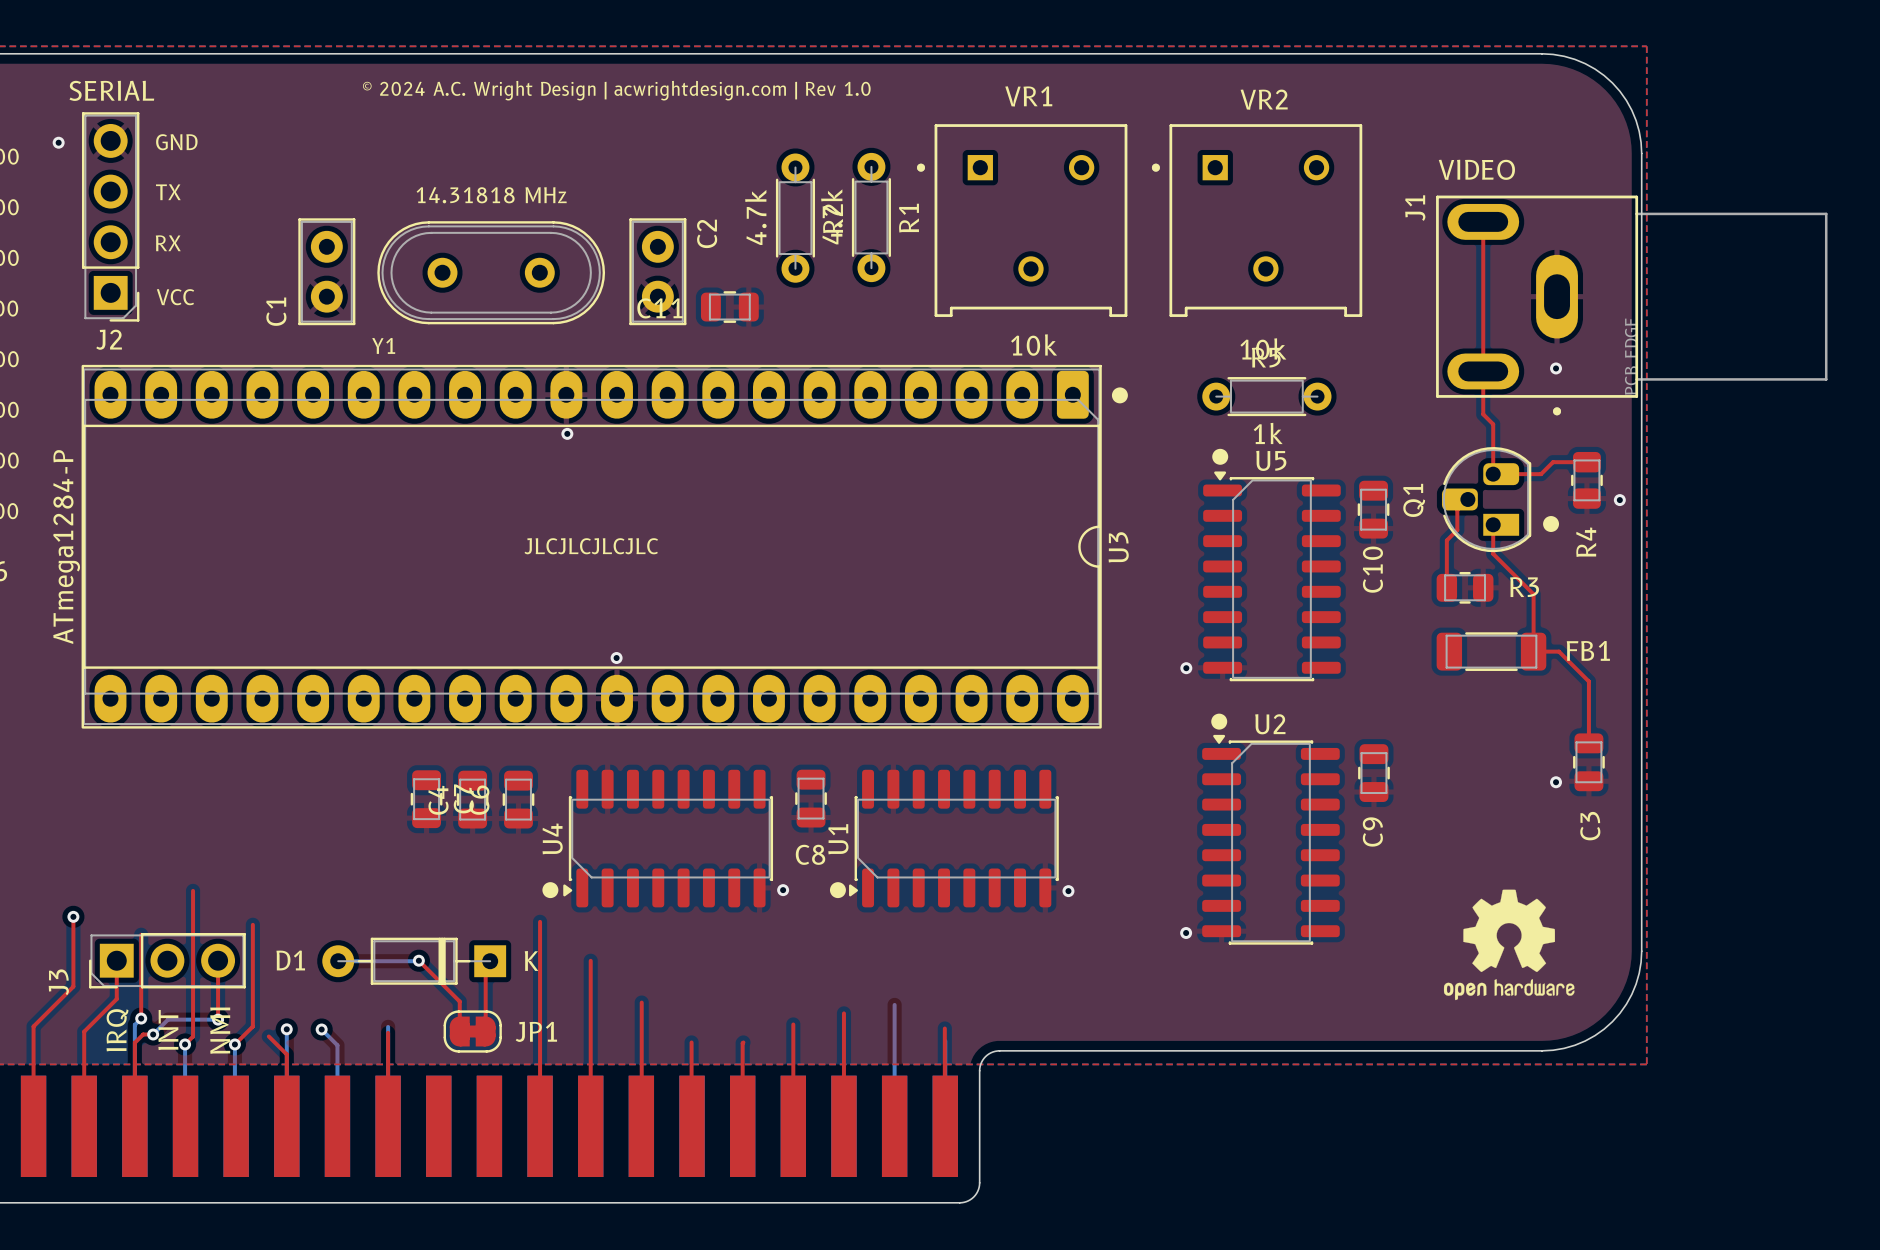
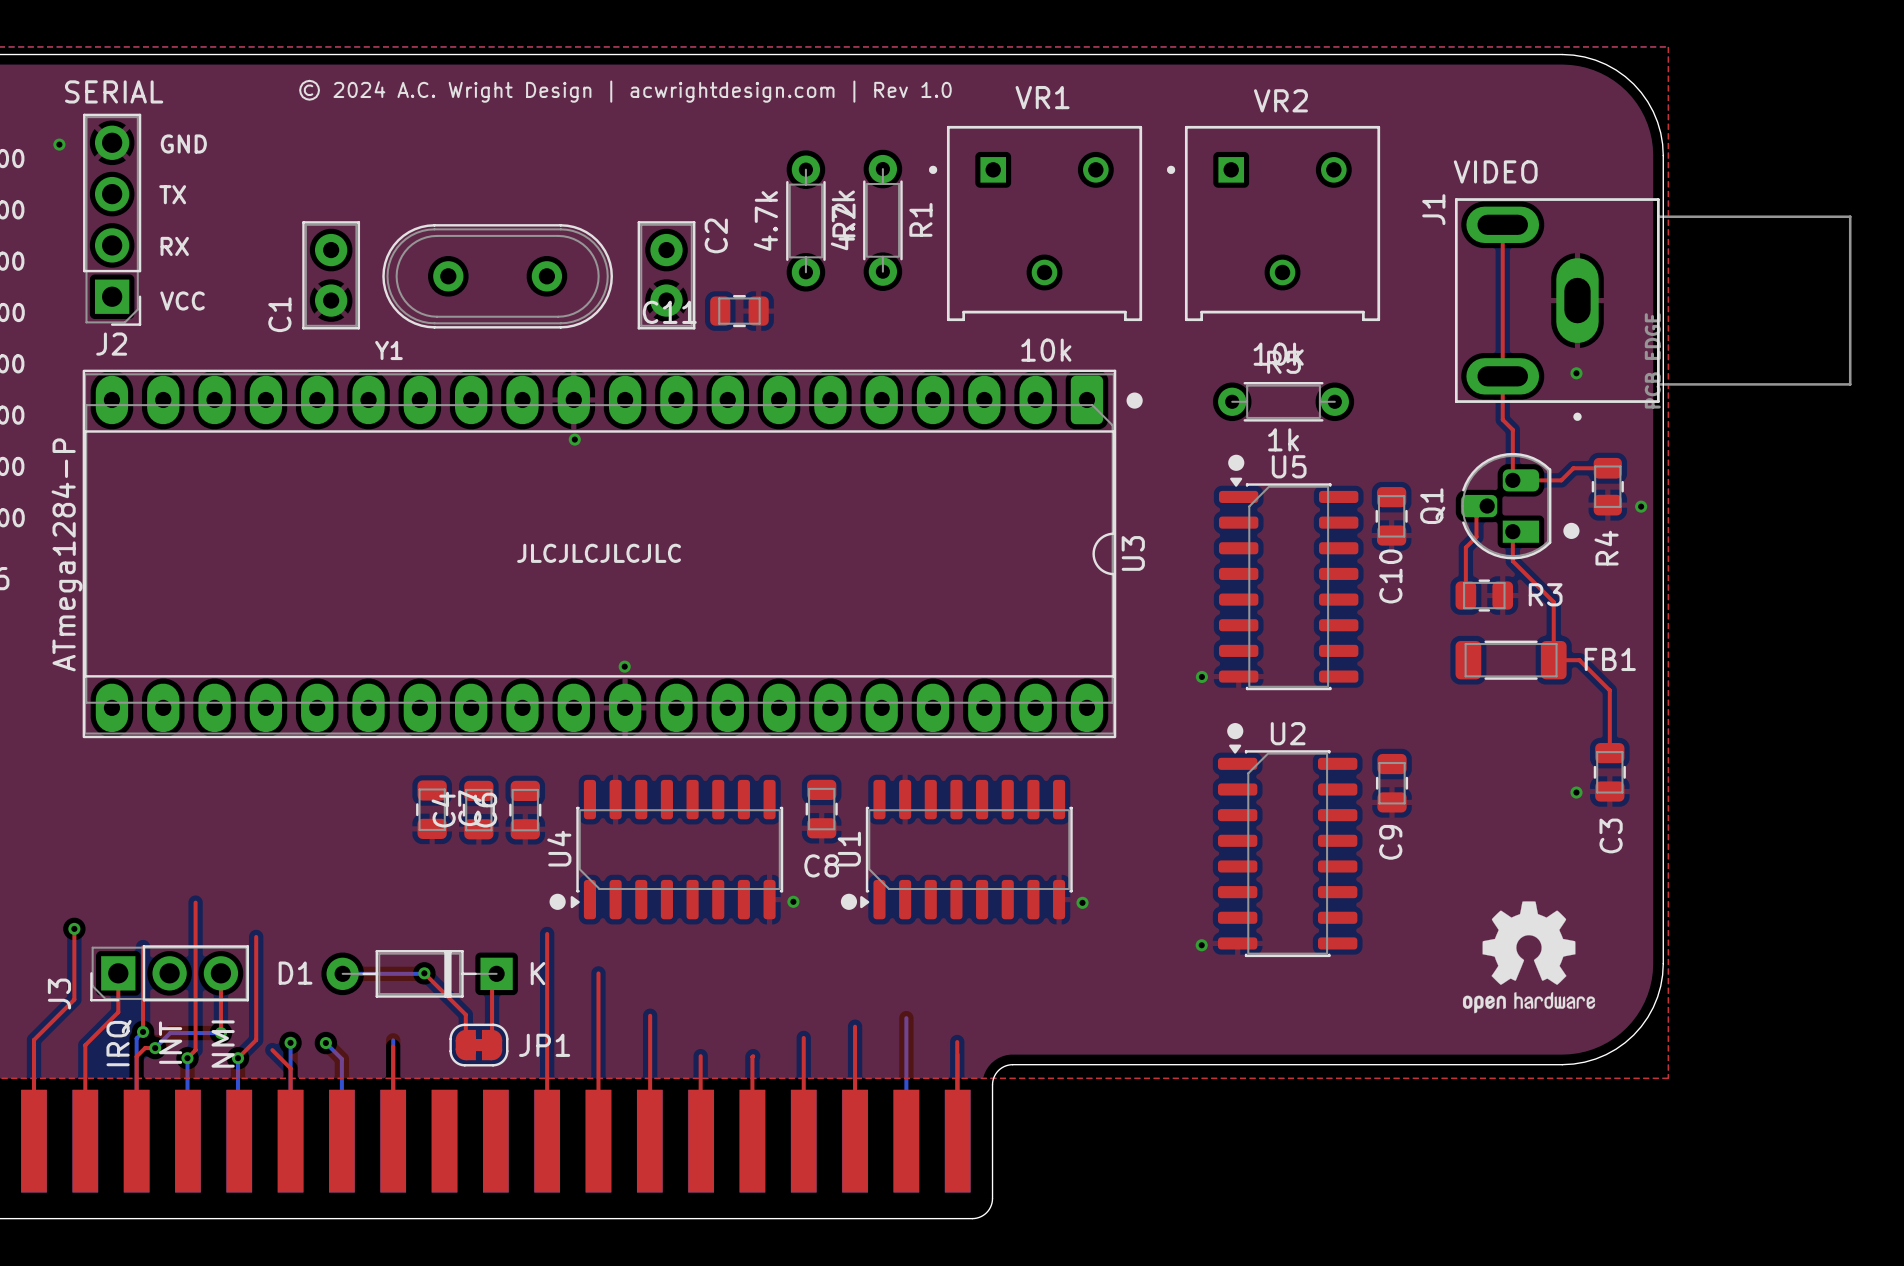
Y1 value: 14.31818 MHz (491, 195) -> none

